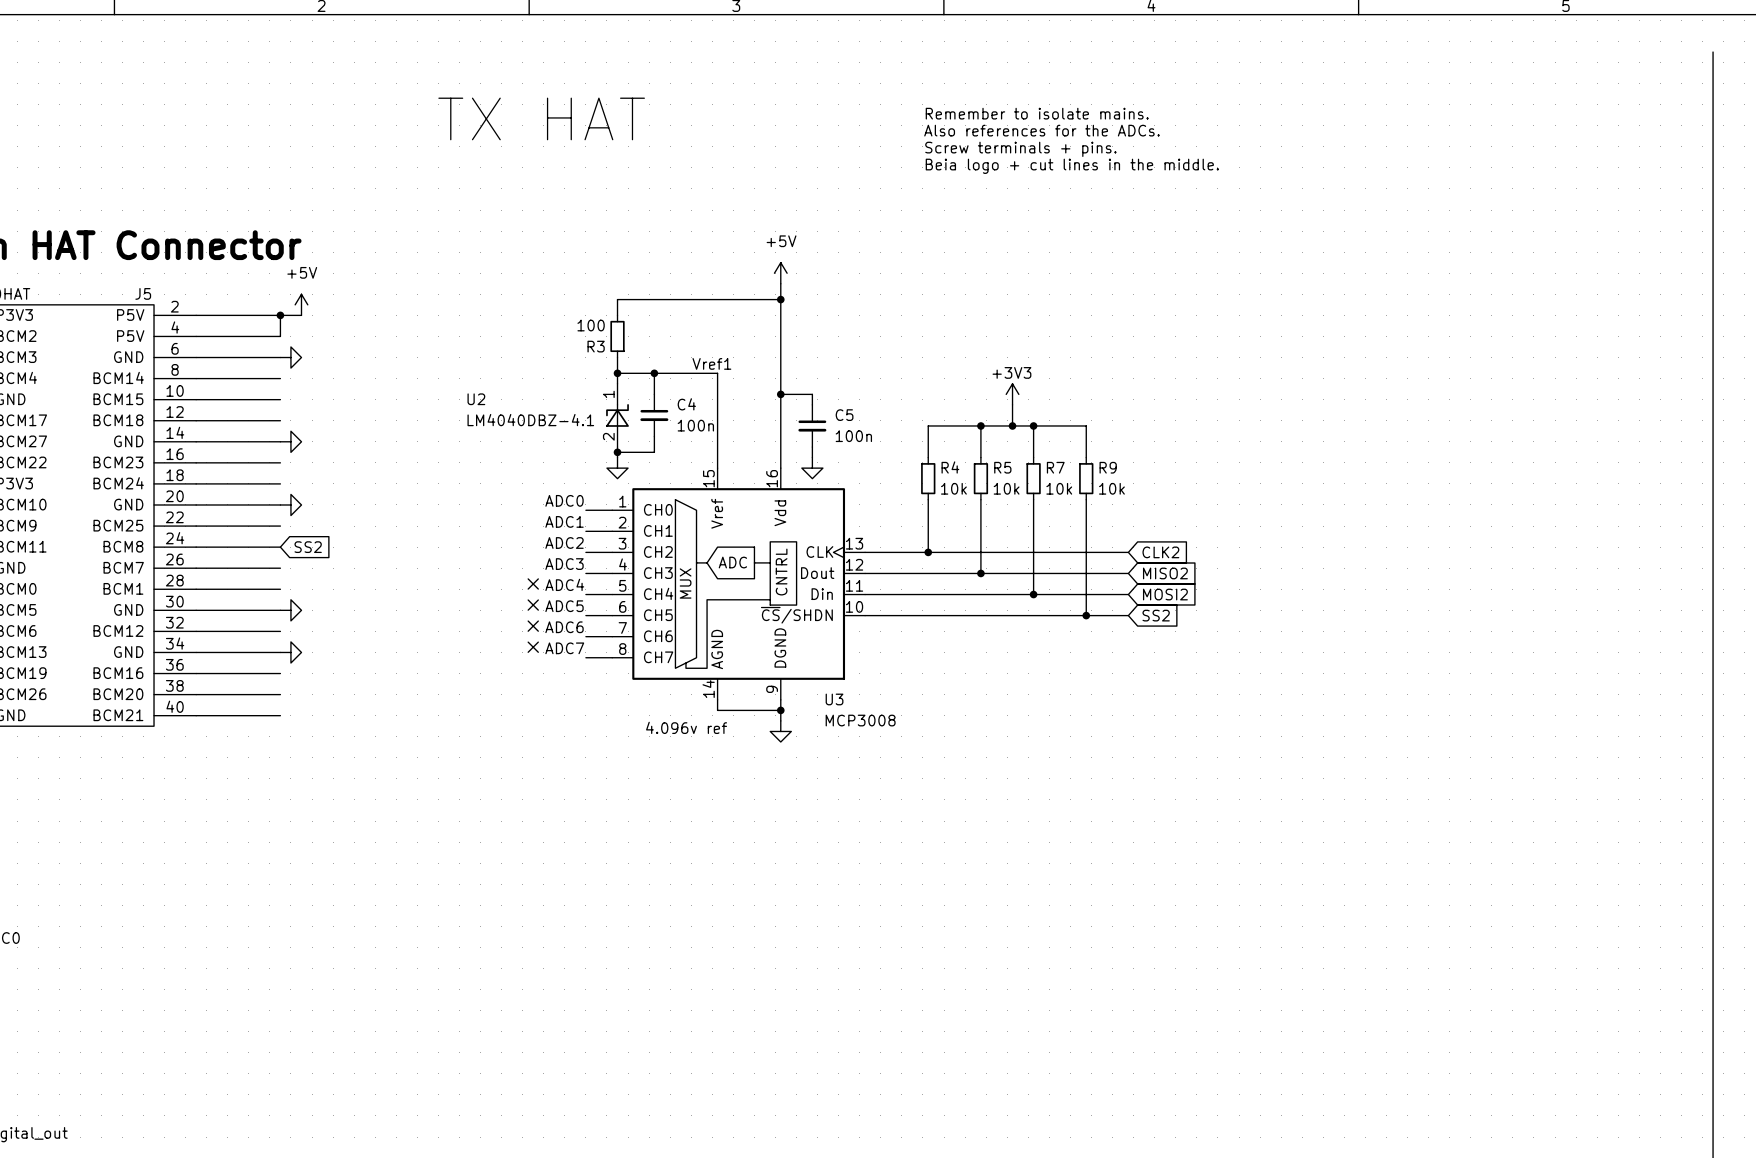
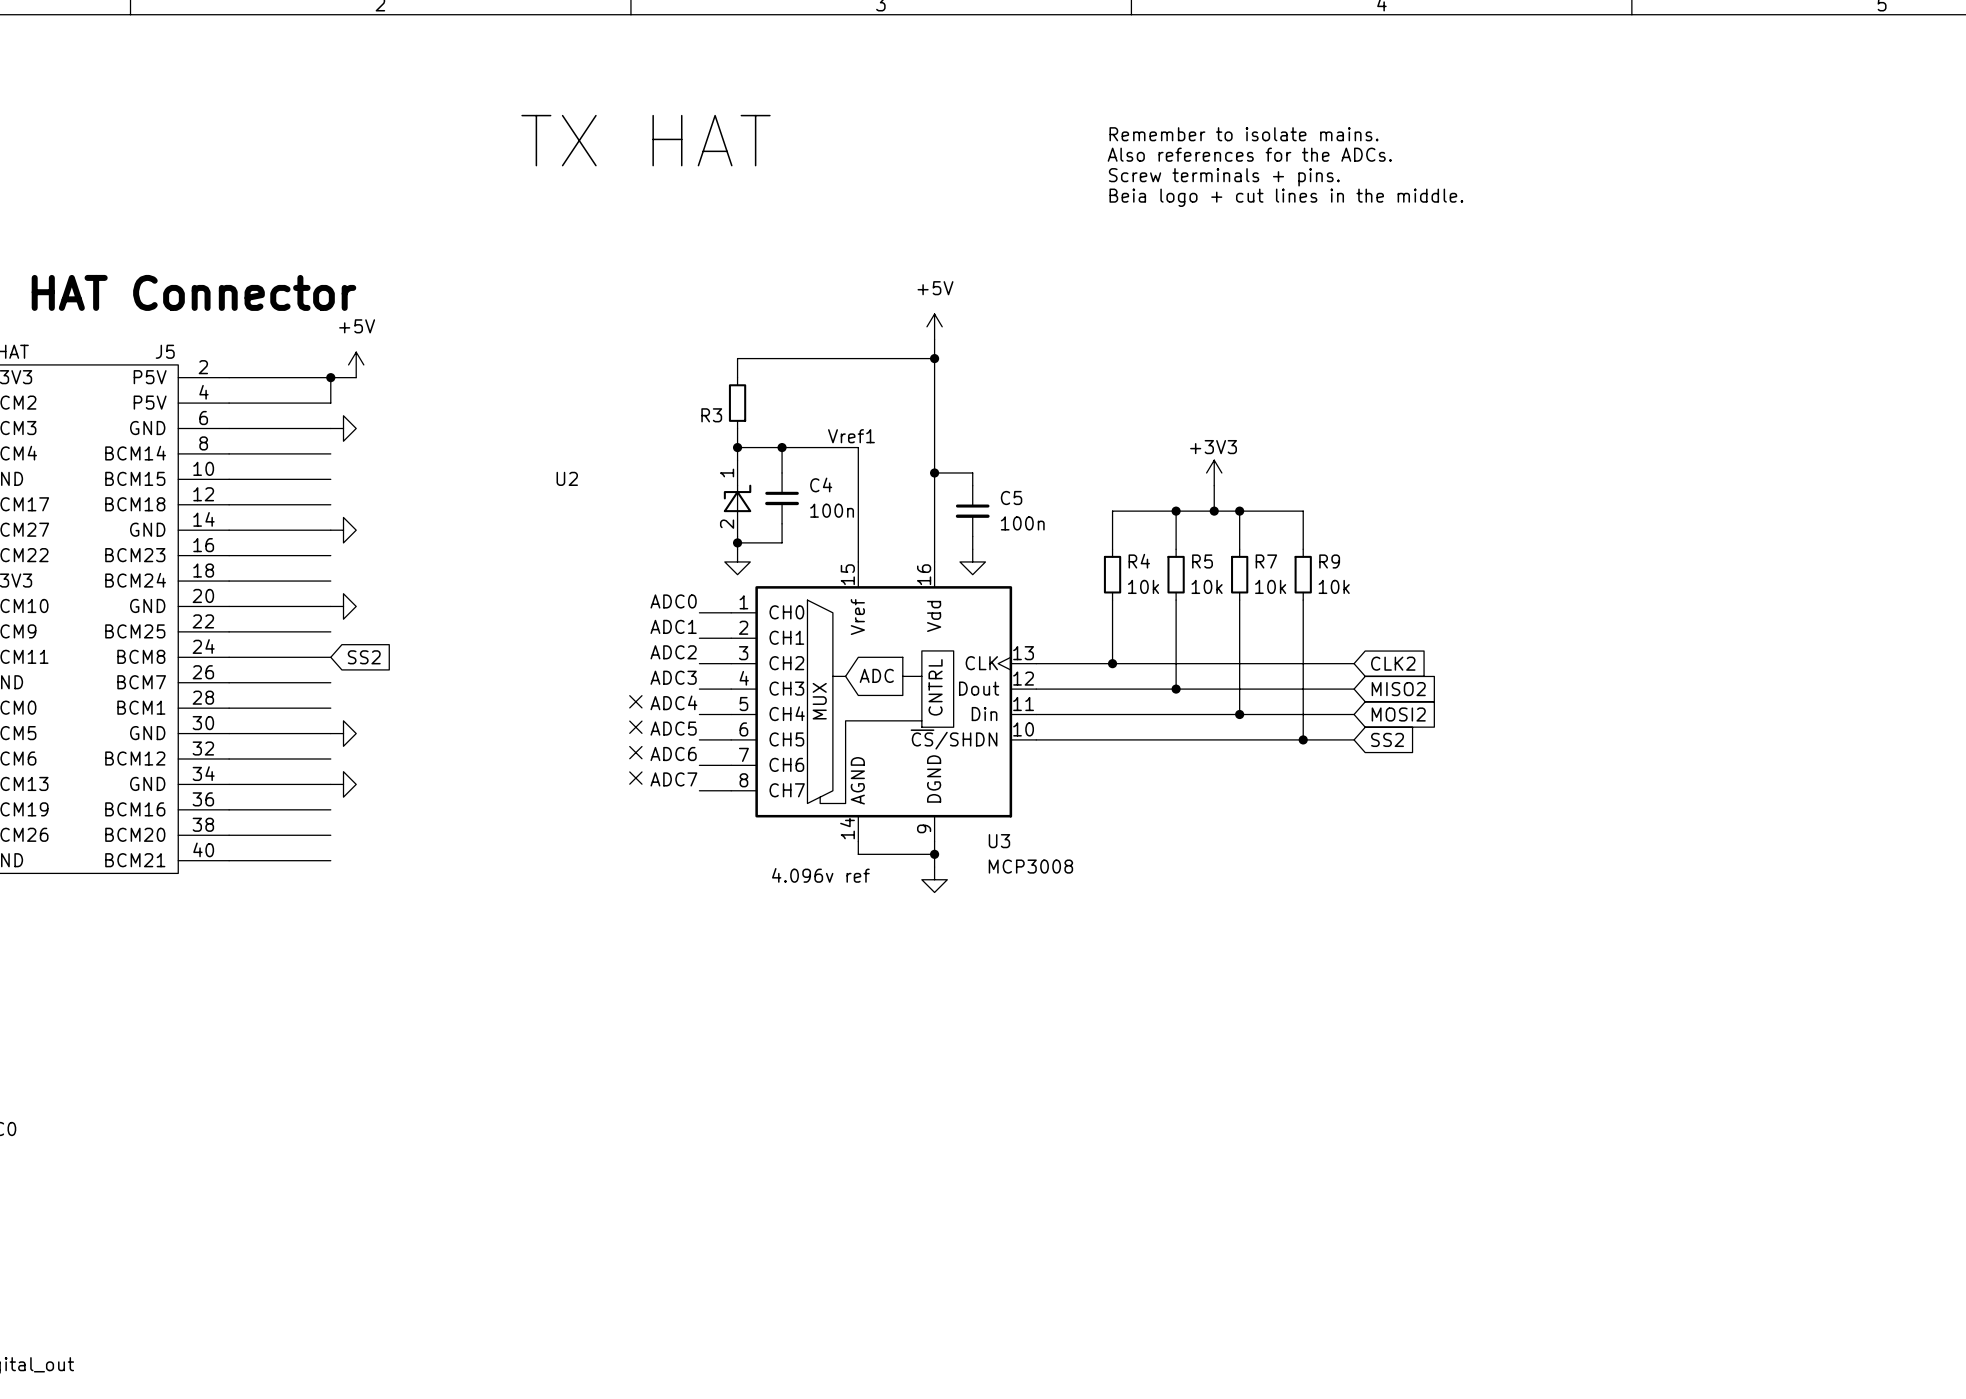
R3 value: 100 (591, 325) -> none
U2 value: LM4040DBZ-4.1 (530, 420) -> none

